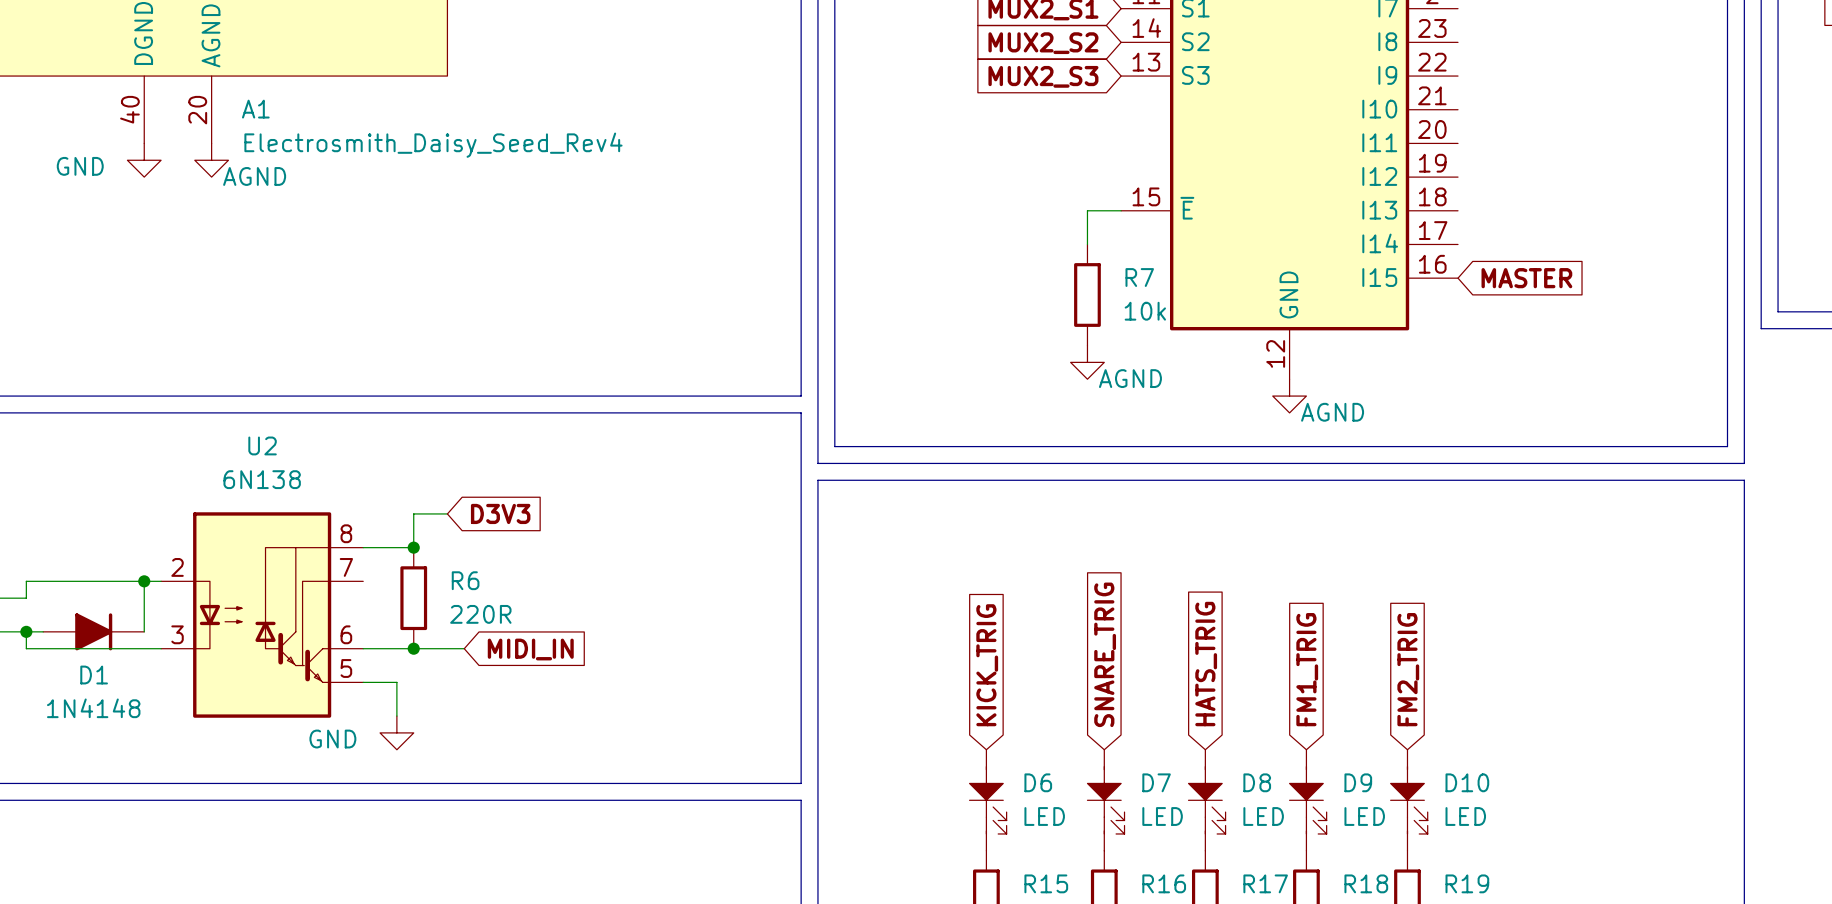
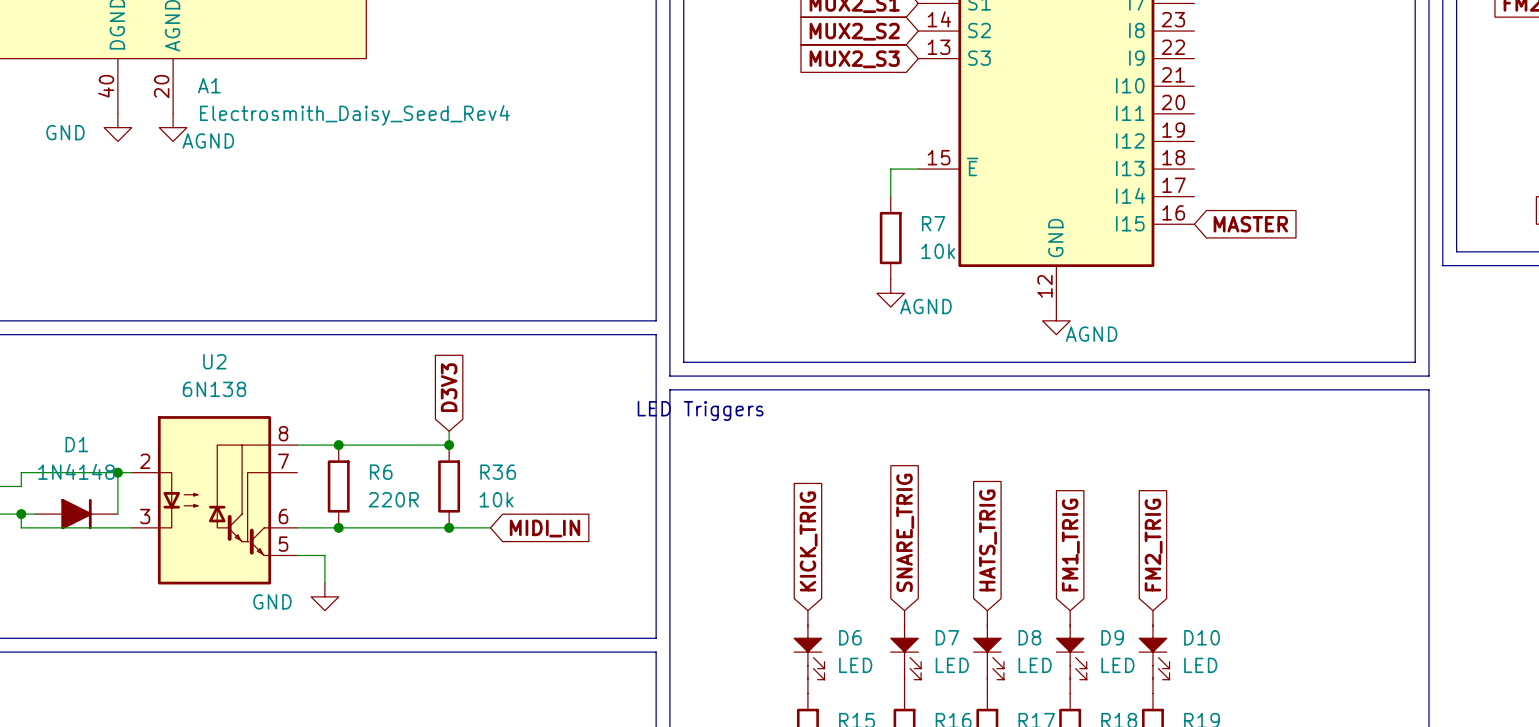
text: none -> LED Triggers (700, 411)
wire: (447, 513) (413, 513) (413, 547) -> (449, 431) (449, 445) (338, 445)
global label rotation: 0° (500, 513) -> 90° counterclockwise (449, 387)
junction: none -> (449, 445)
R36: none -> 10k (449, 486)
wire: none -> (380, 527) (490, 527)
junction: none -> (449, 527)
global label position: MIDI_IN (530, 649) -> MIDI_IN (544, 528)
D1 name position: D1 (94, 675) -> D1 (76, 444)
D1 value position: 1N4148 (93, 708) -> 1N4148 (76, 471)

